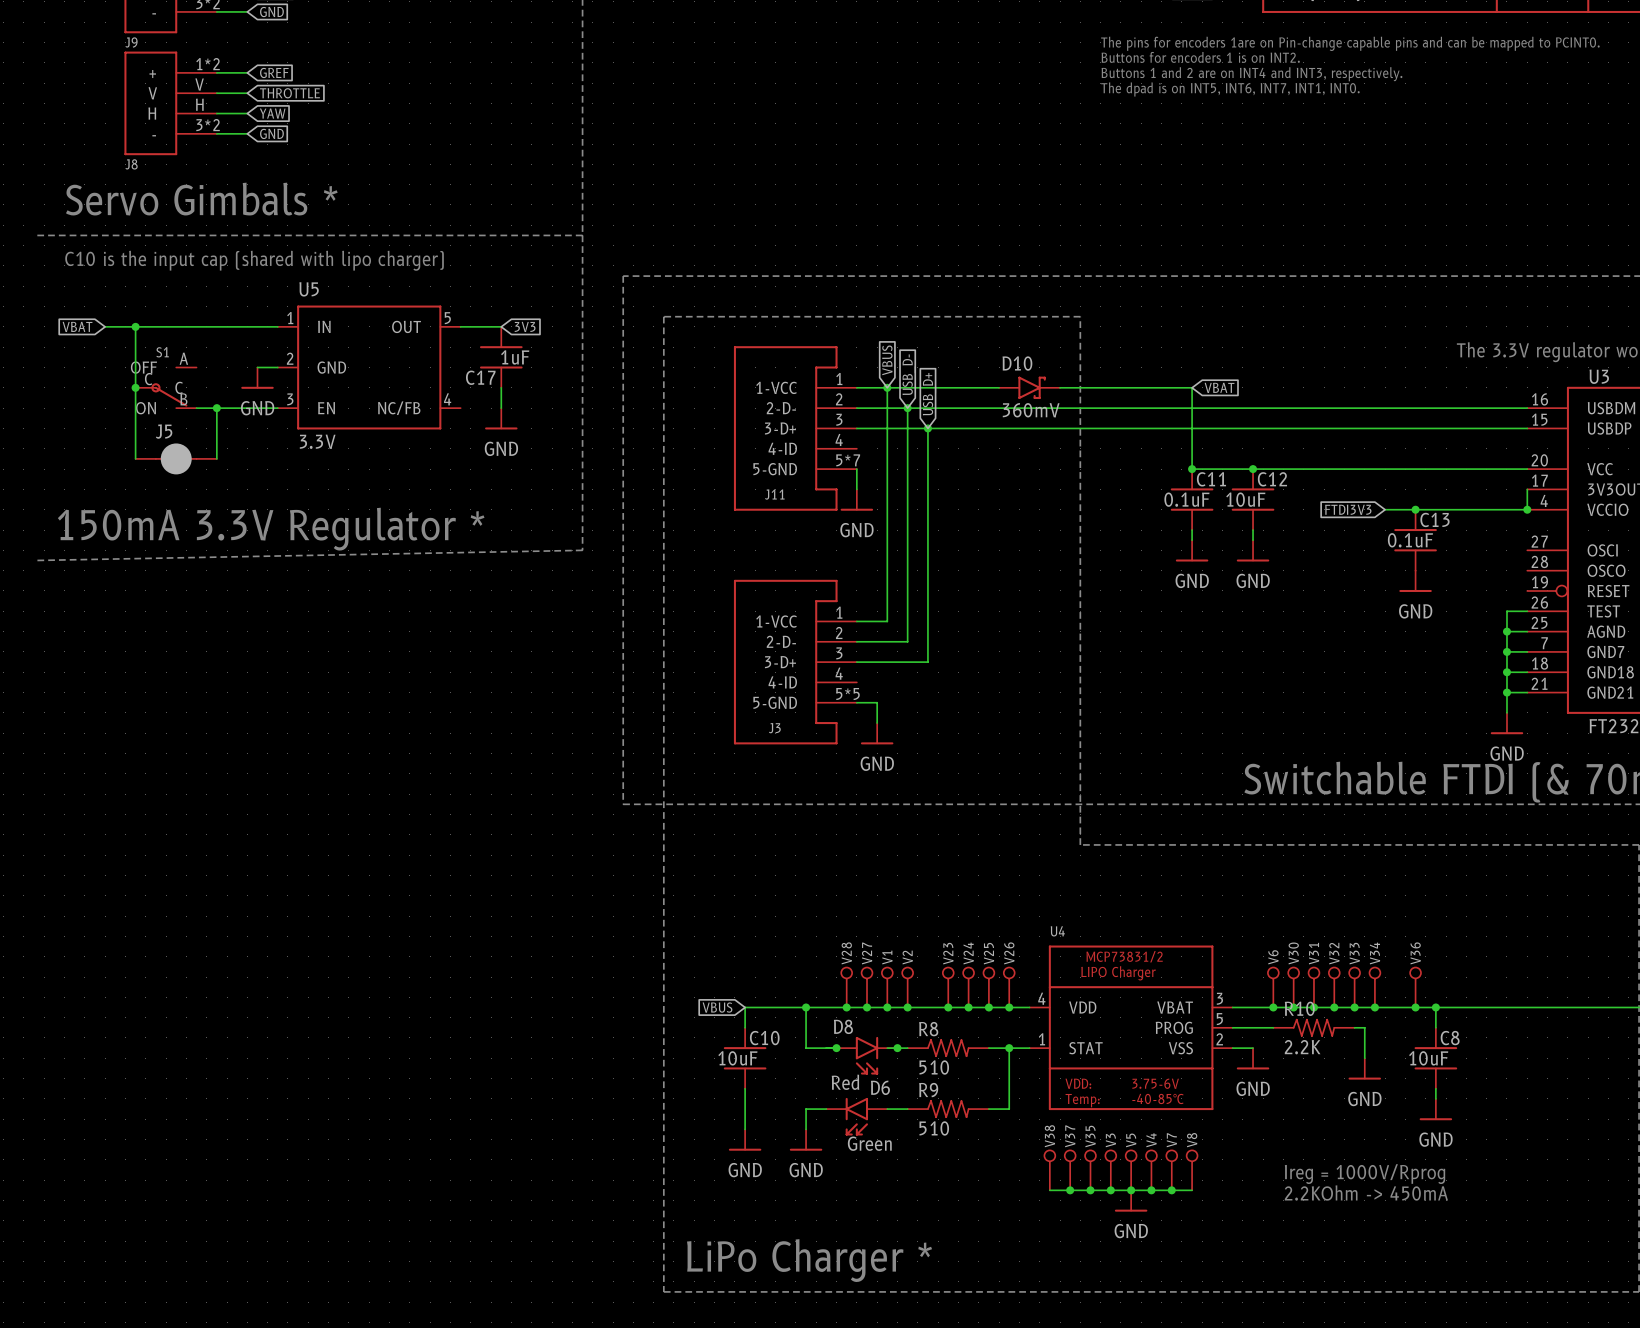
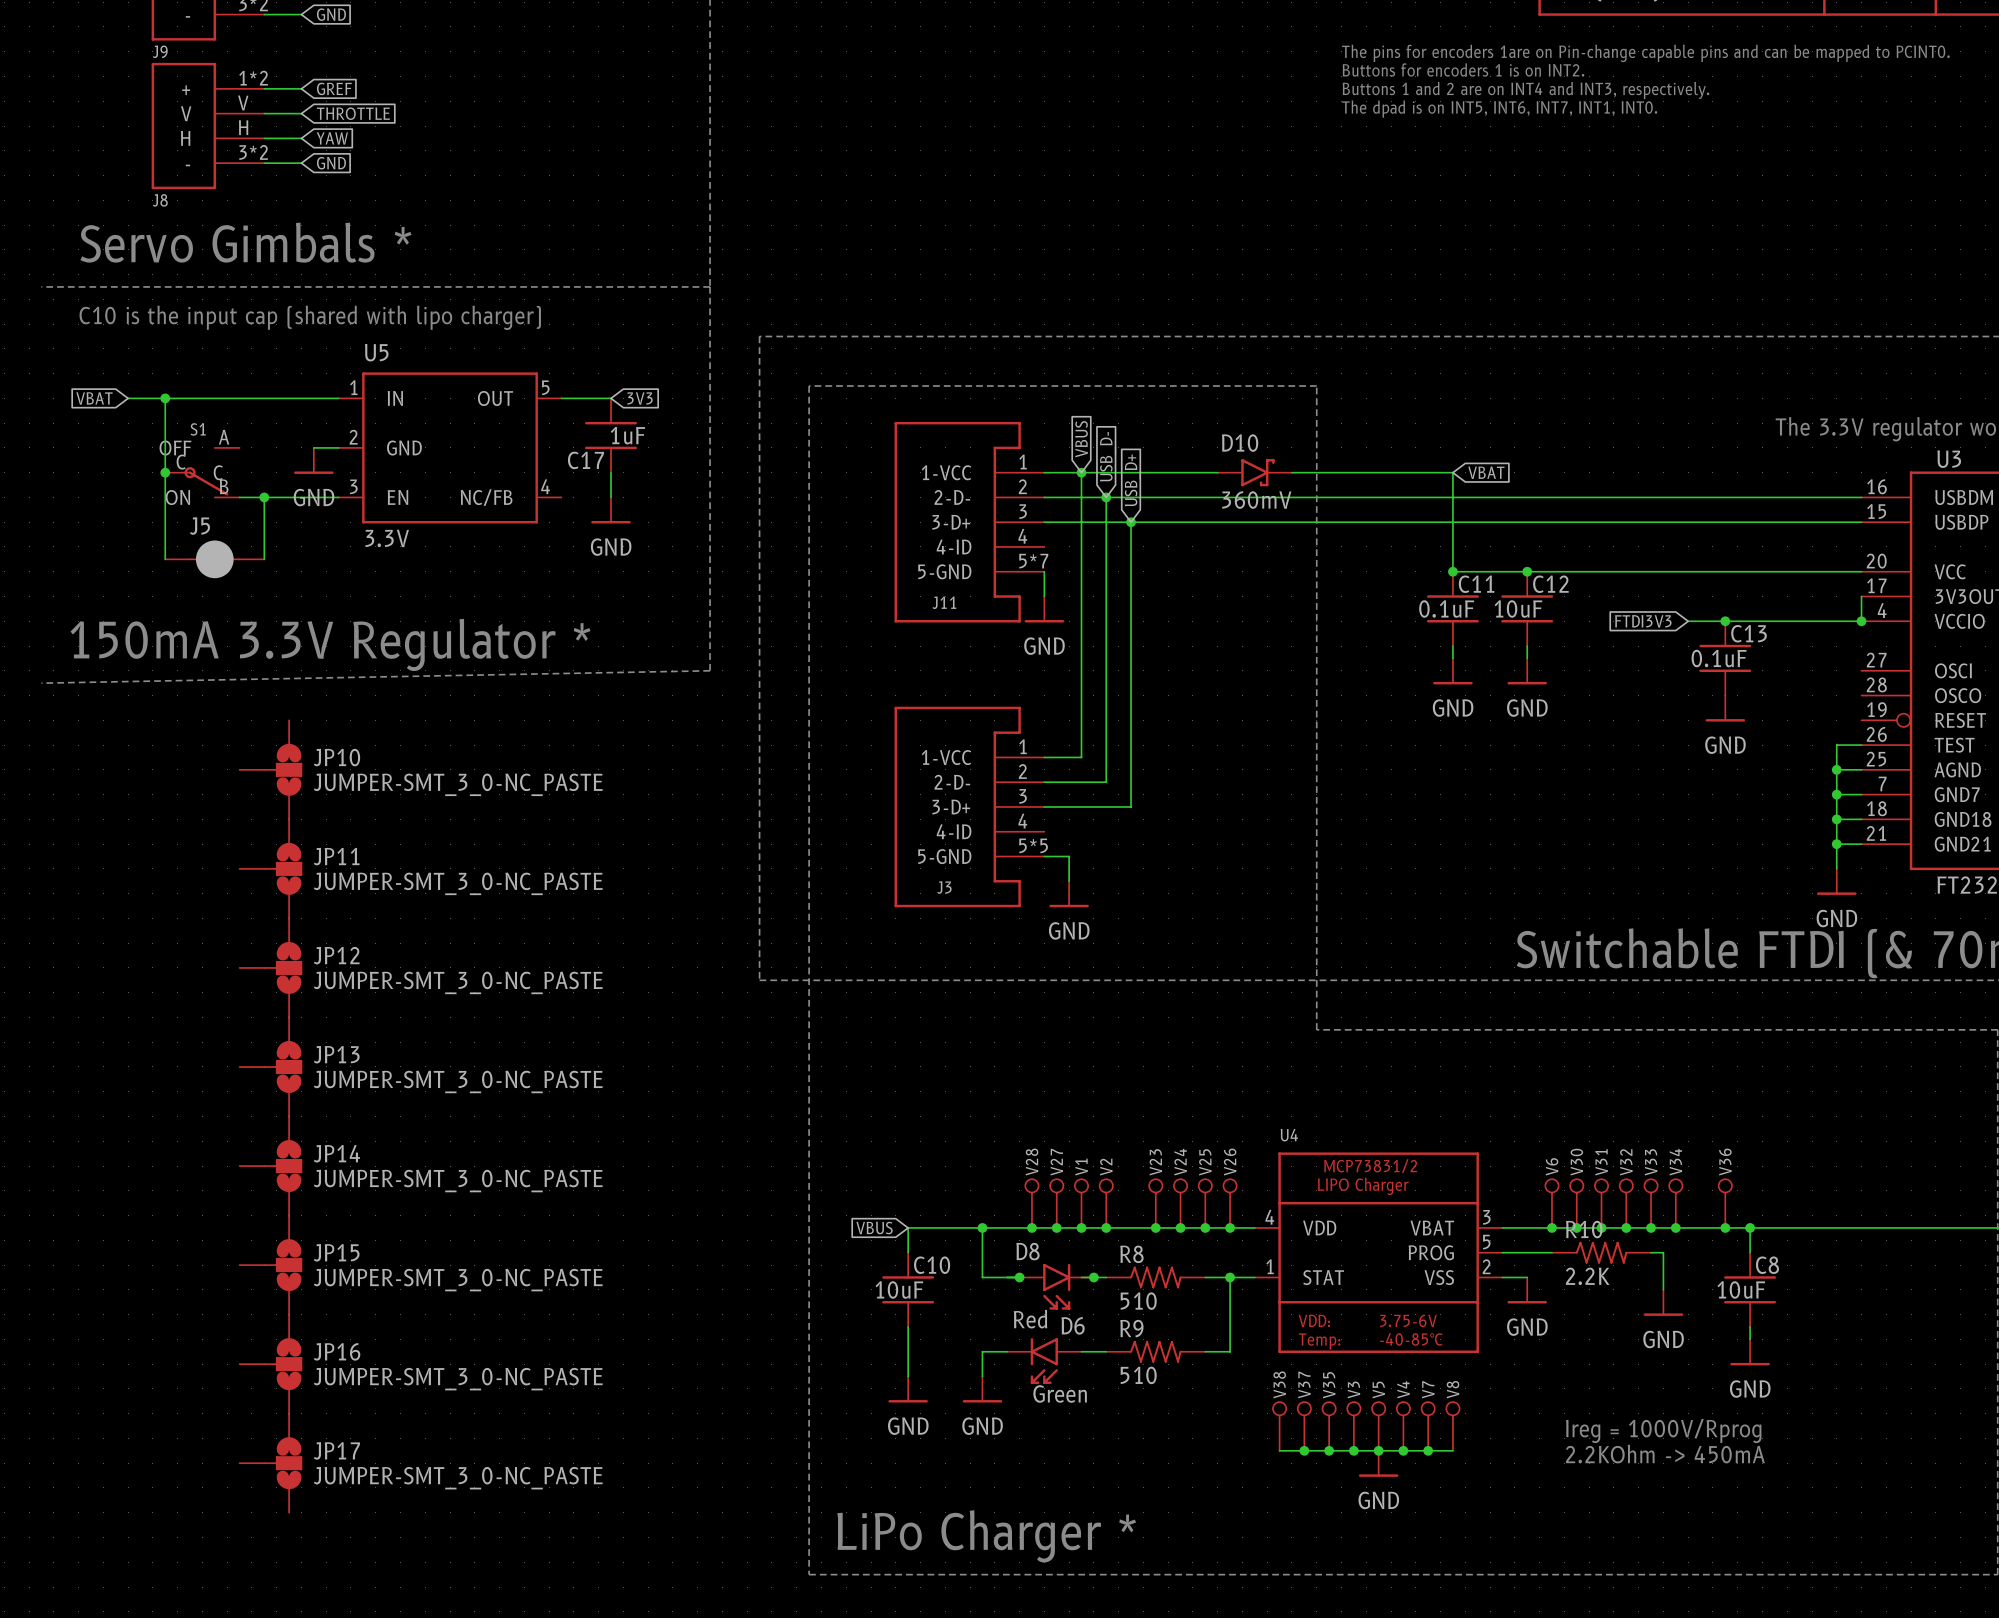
JP10: none -> JUMPER-SMT_3_0-NC_PASTE (270, 769)
JP11: none -> JUMPER-SMT_3_0-NC_PASTE (270, 868)
JP12: none -> JUMPER-SMT_3_0-NC_PASTE (270, 967)
JP13: none -> JUMPER-SMT_3_0-NC_PASTE (270, 1066)
JP14: none -> JUMPER-SMT_3_0-NC_PASTE (270, 1166)
JP15: none -> JUMPER-SMT_3_0-NC_PASTE (270, 1265)
JP16: none -> JUMPER-SMT_3_0-NC_PASTE (270, 1364)
JP17: none -> JUMPER-SMT_3_0-NC_PASTE (270, 1463)

